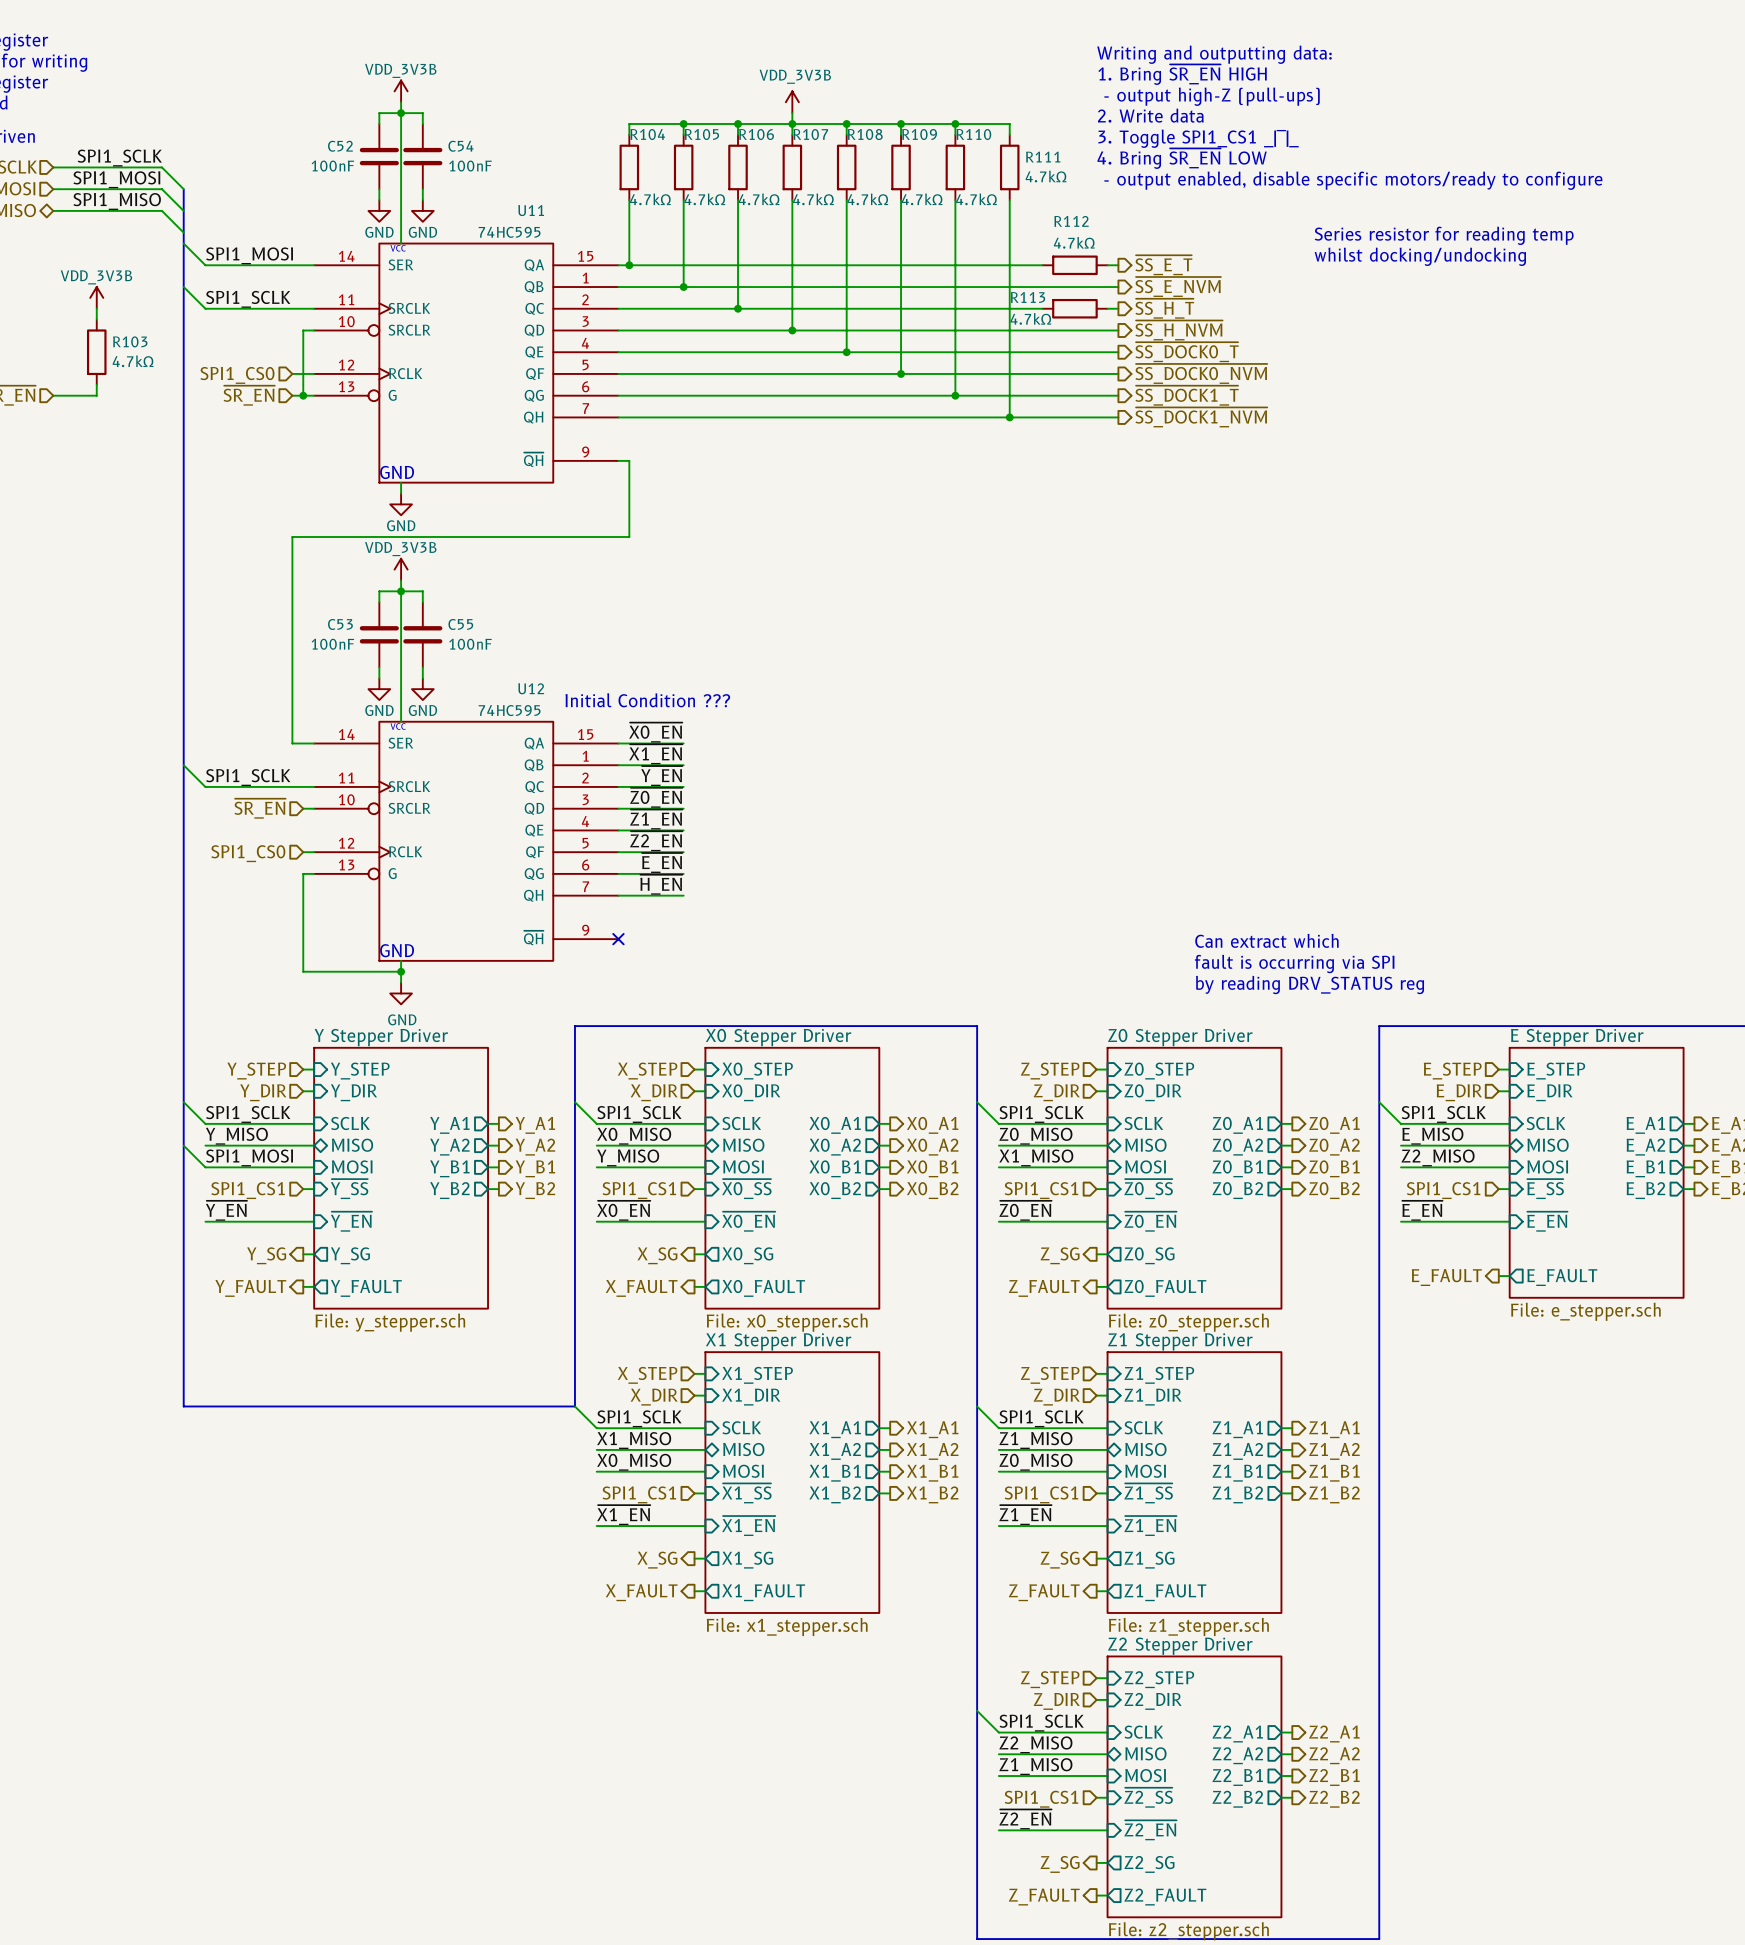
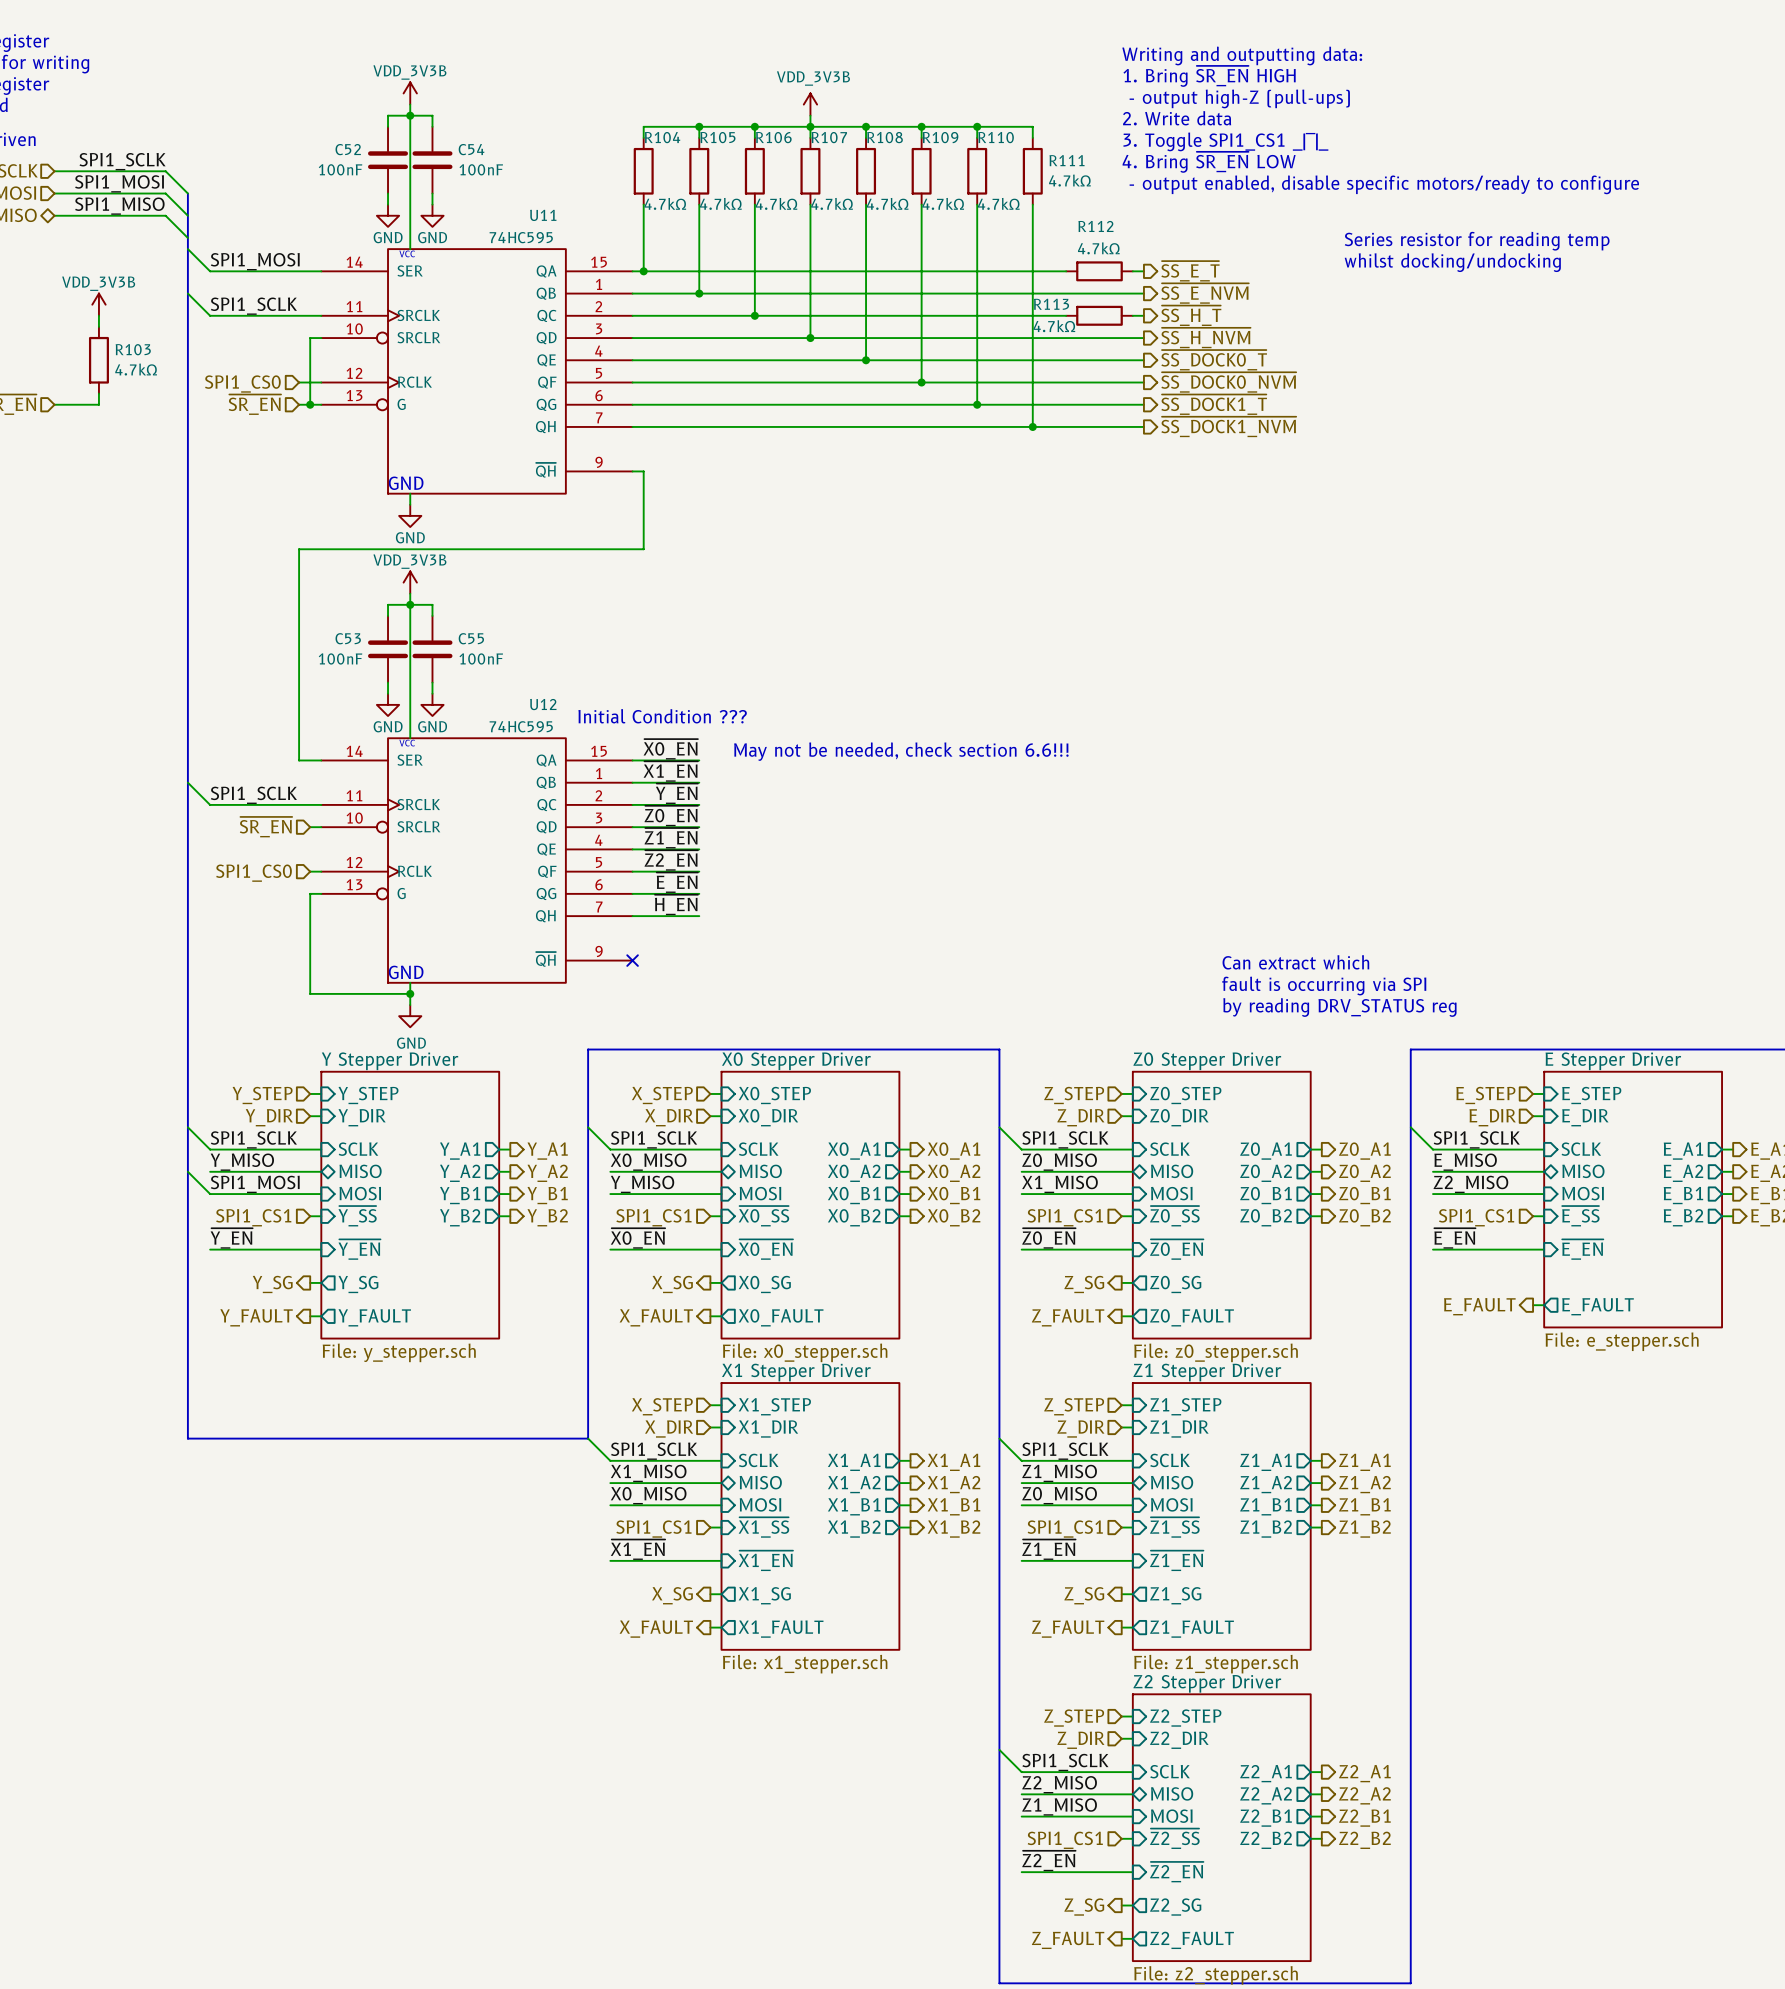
text: none -> May not be needed, check section 6.6!!! (901, 751)

